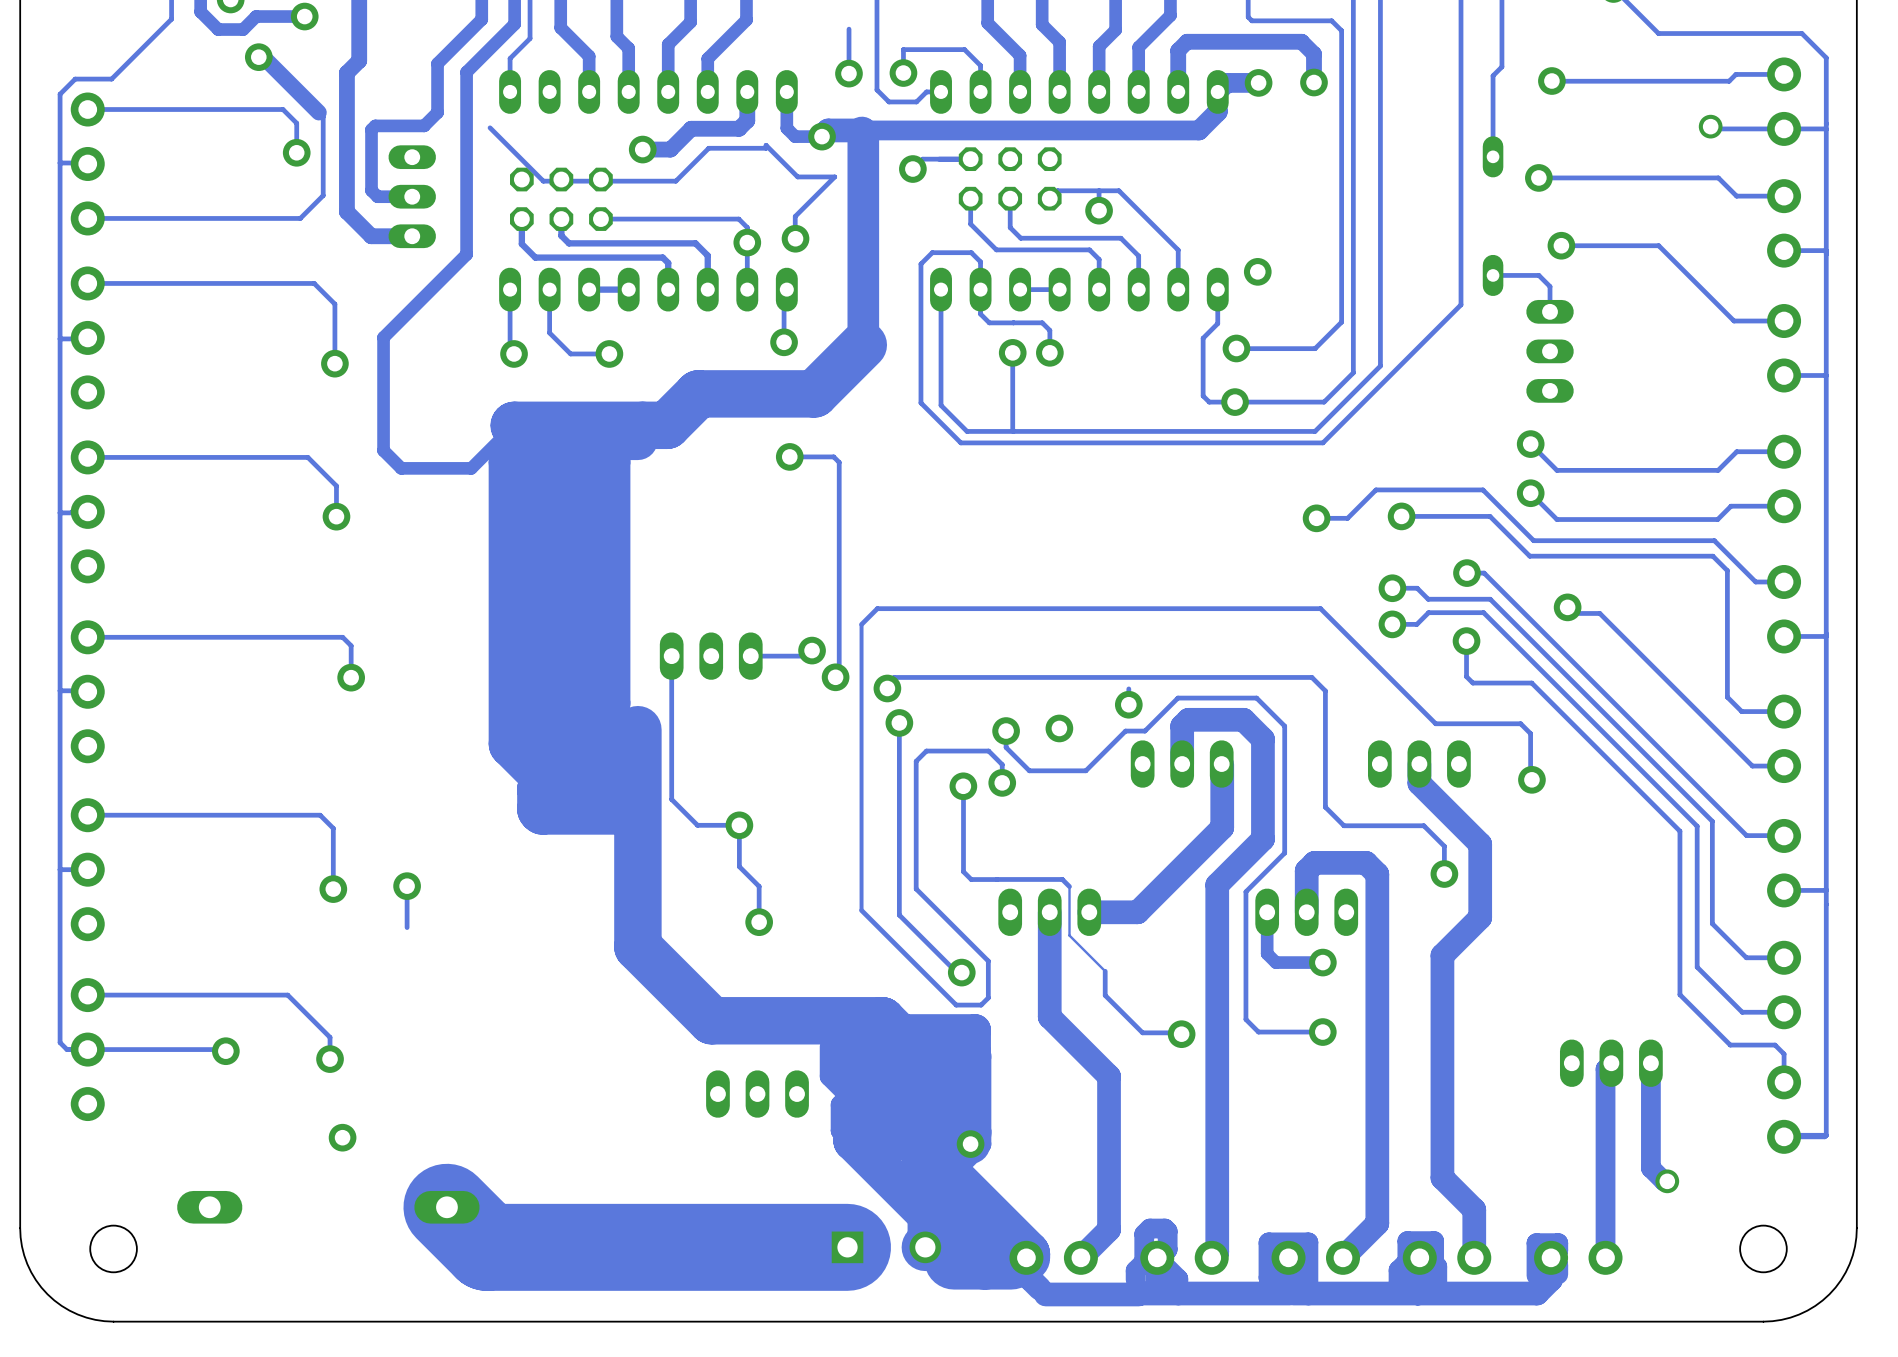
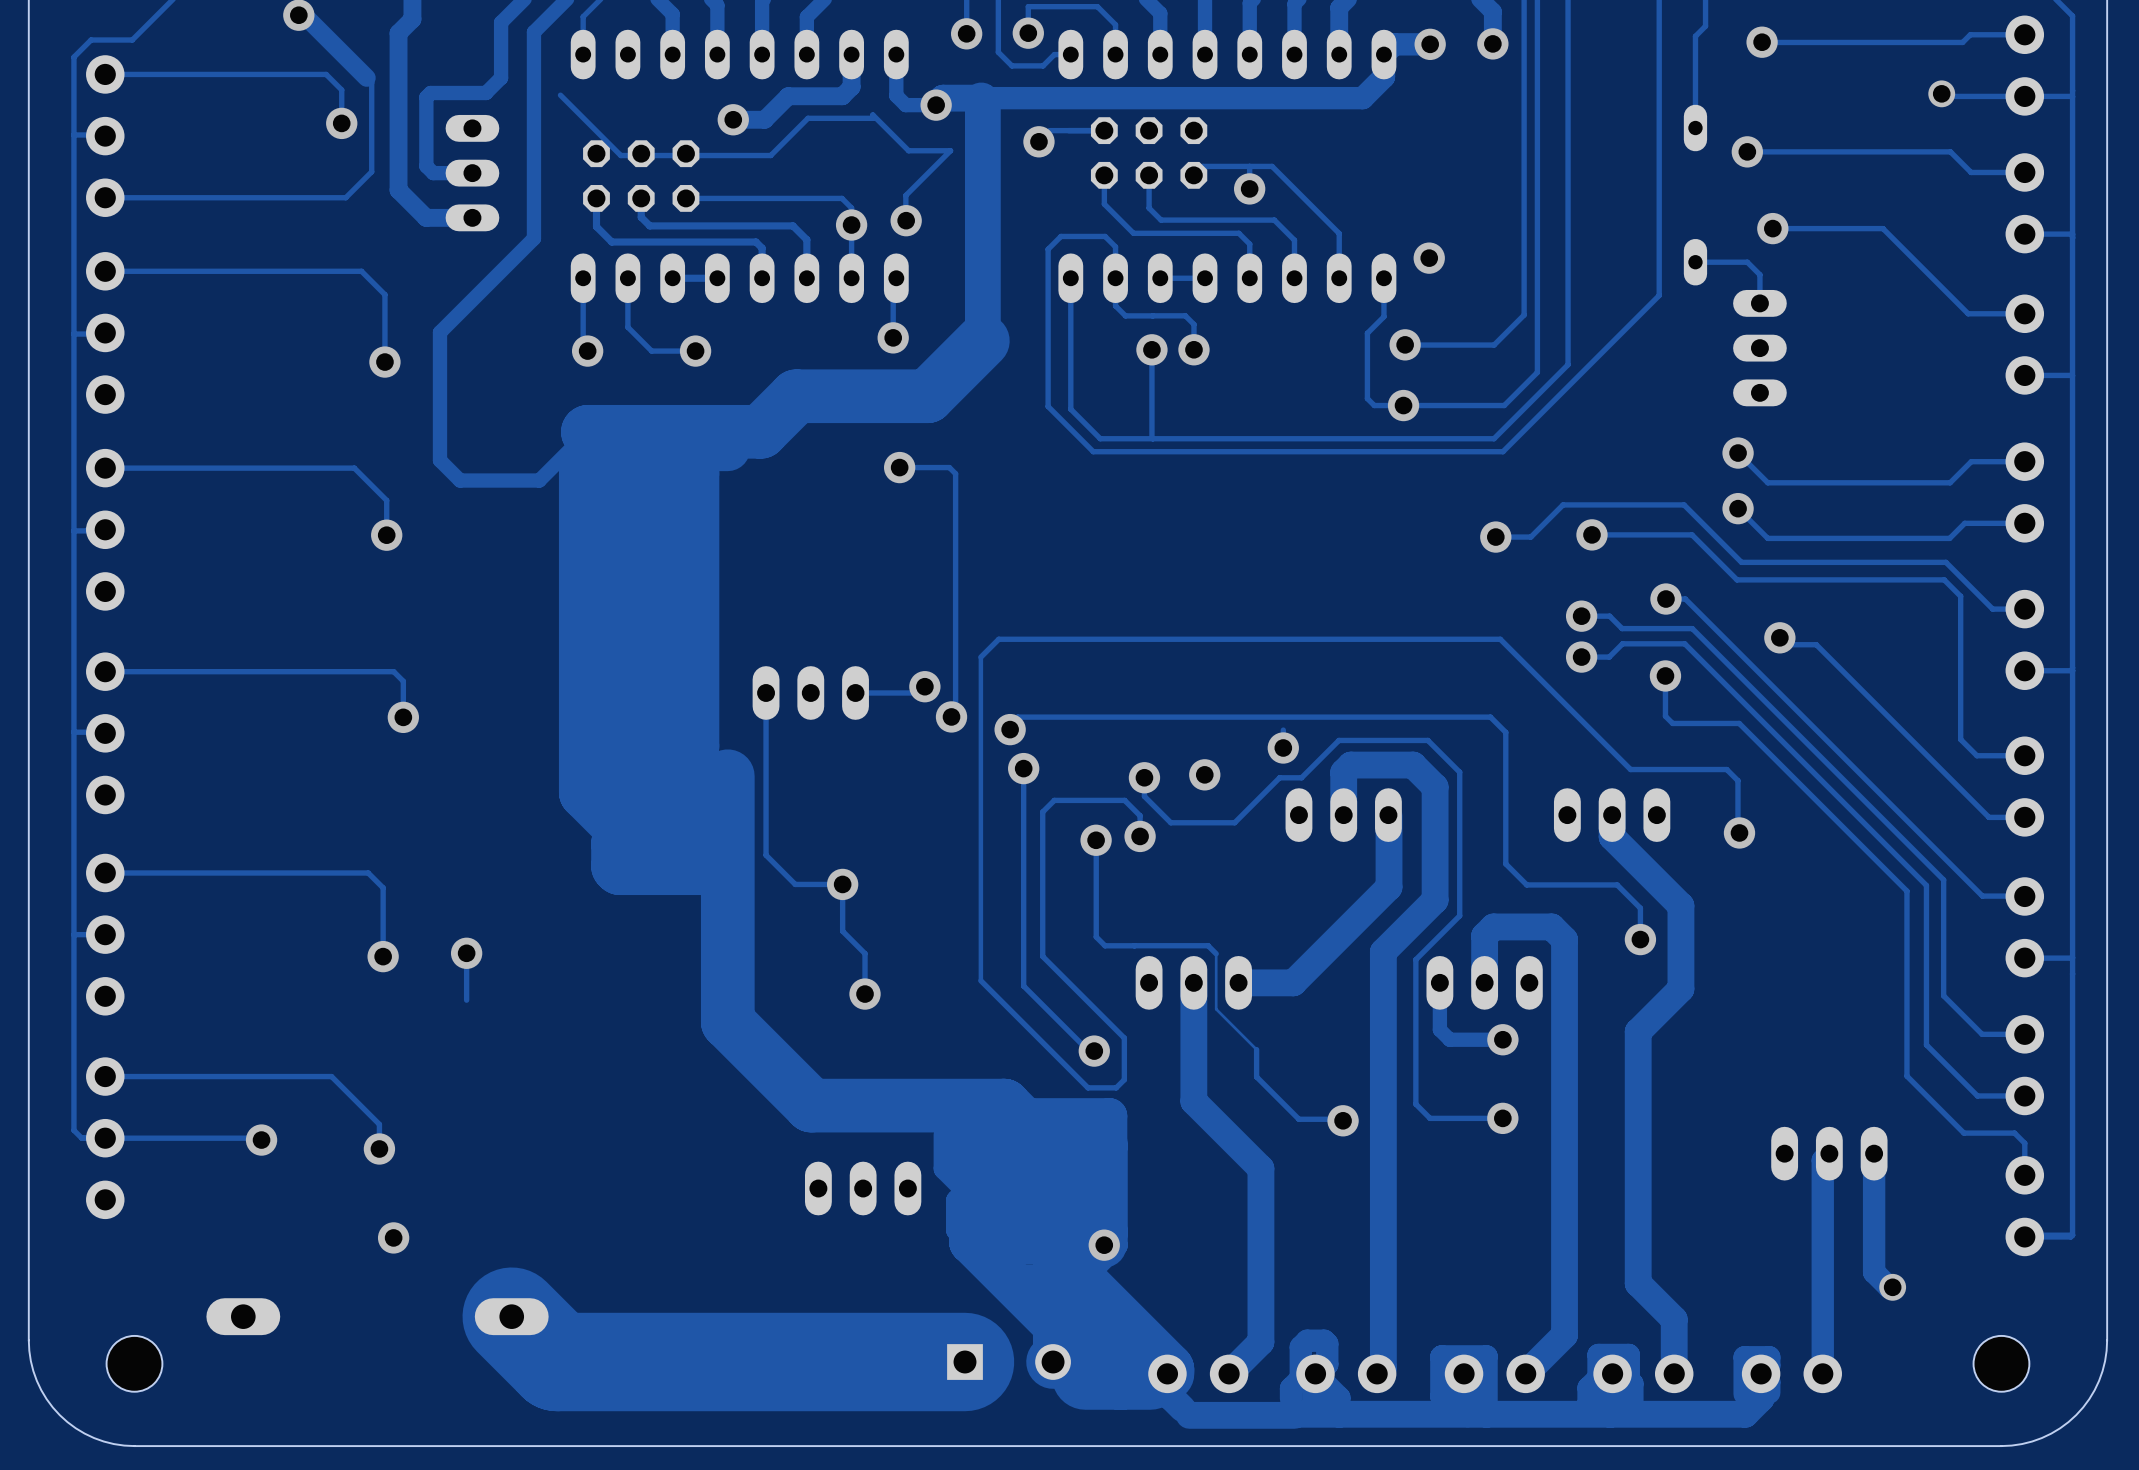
round board edge: [90, 1225, 137, 1273] -> none
round board edge: [1740, 1225, 1787, 1273] -> none
hole: none -> (134, 1363)
hole: none -> (2001, 1363)

